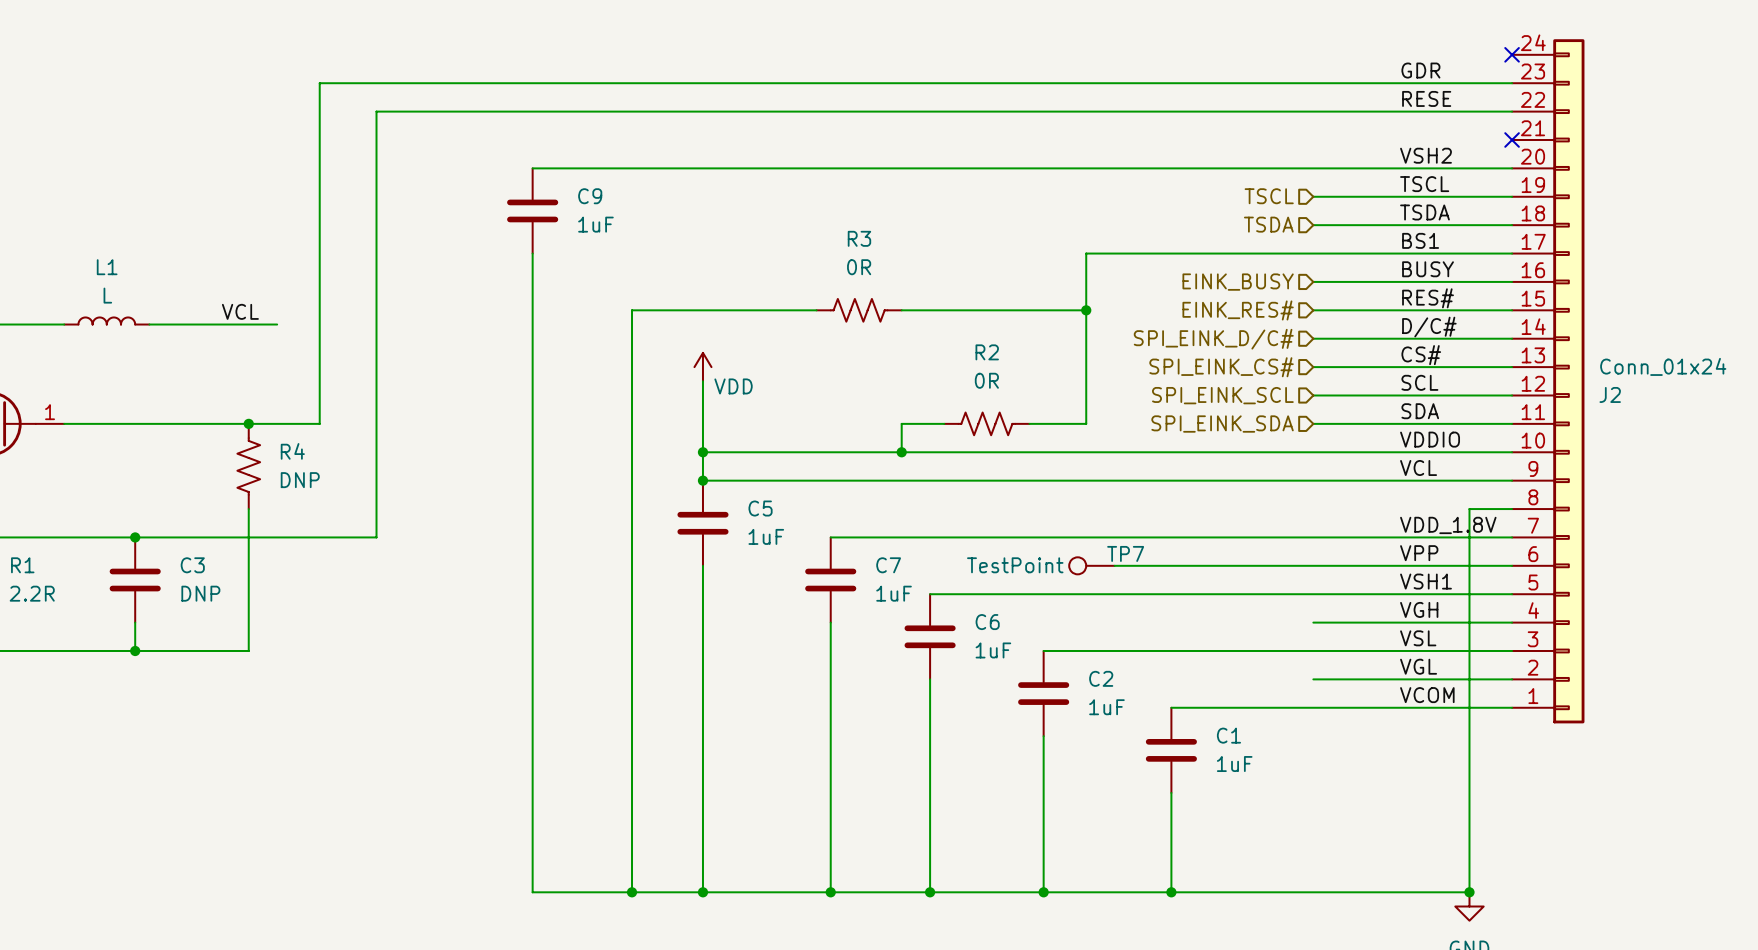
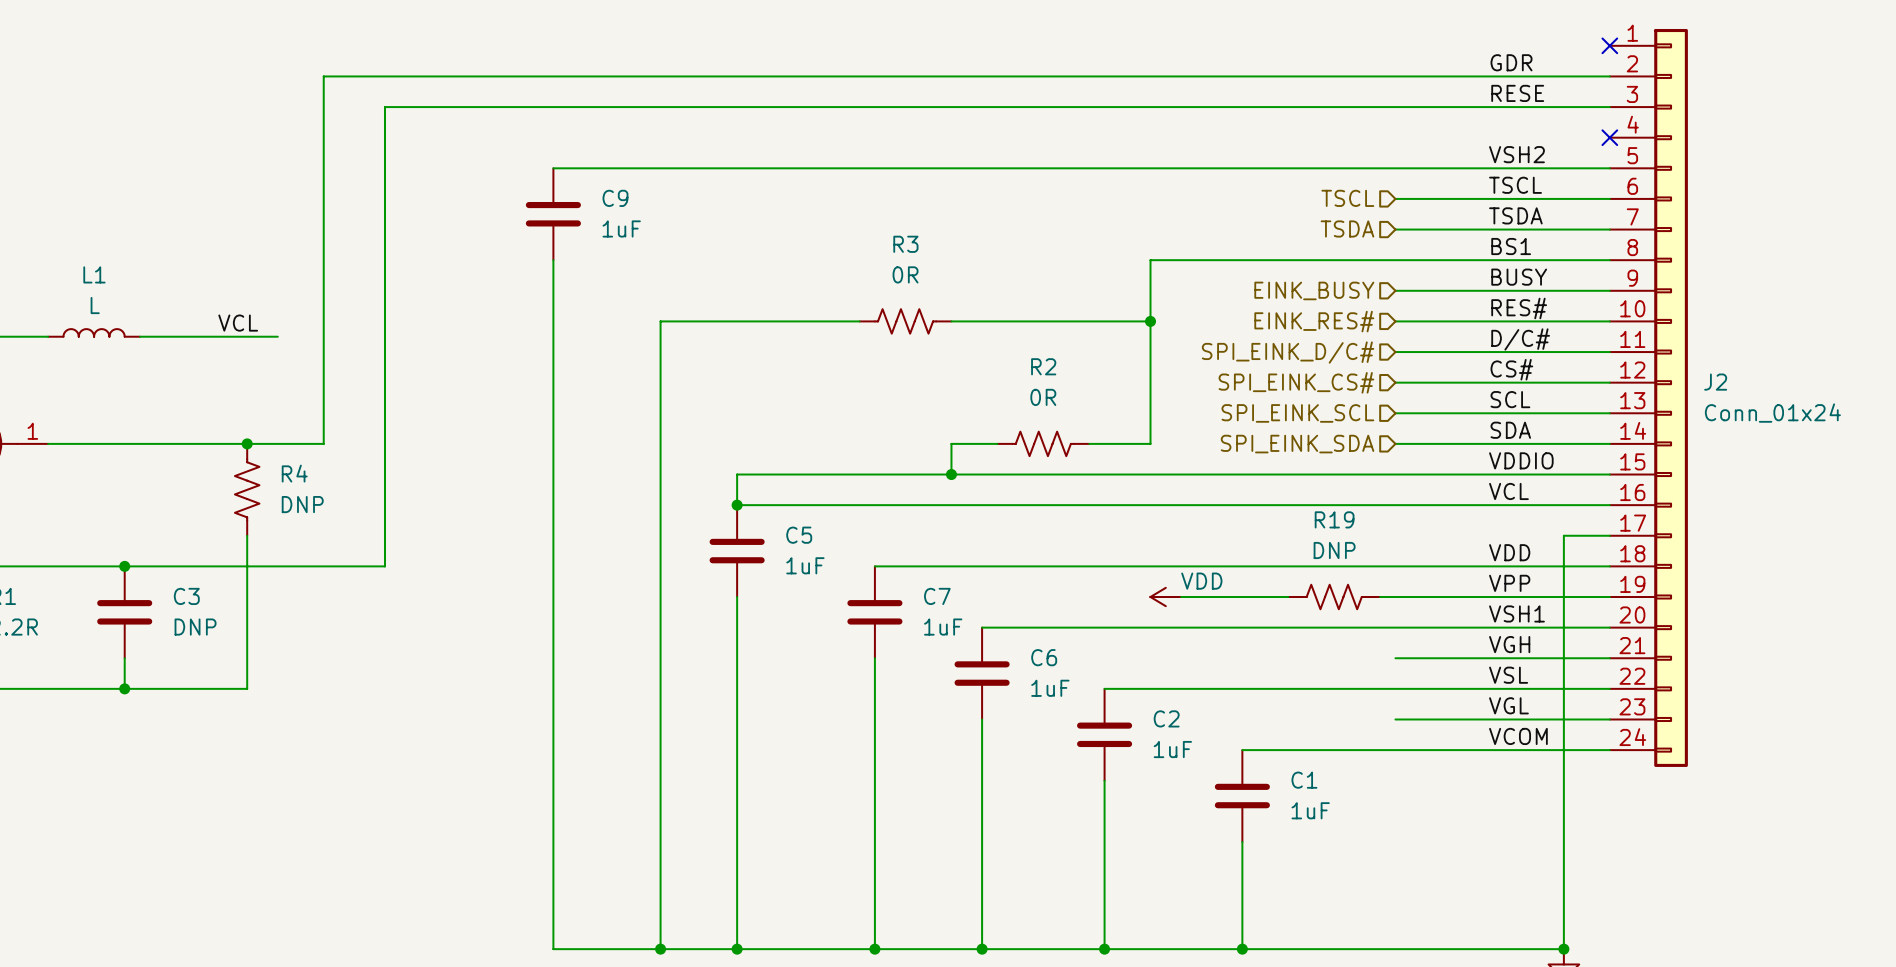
power symbol: VDD (702, 367) -> none
wire: (702, 381) (702, 452) -> none
J2 flip: as is (1568, 381) -> up-down (1671, 397)
junction: (702, 452) -> none
label: VDD_1.8V (1448, 525) -> VDD (1509, 552)
TP7: TestPoint (1091, 565) -> none
power symbol: none -> VDD (1165, 597)
R19: none -> DNP (1334, 597)

